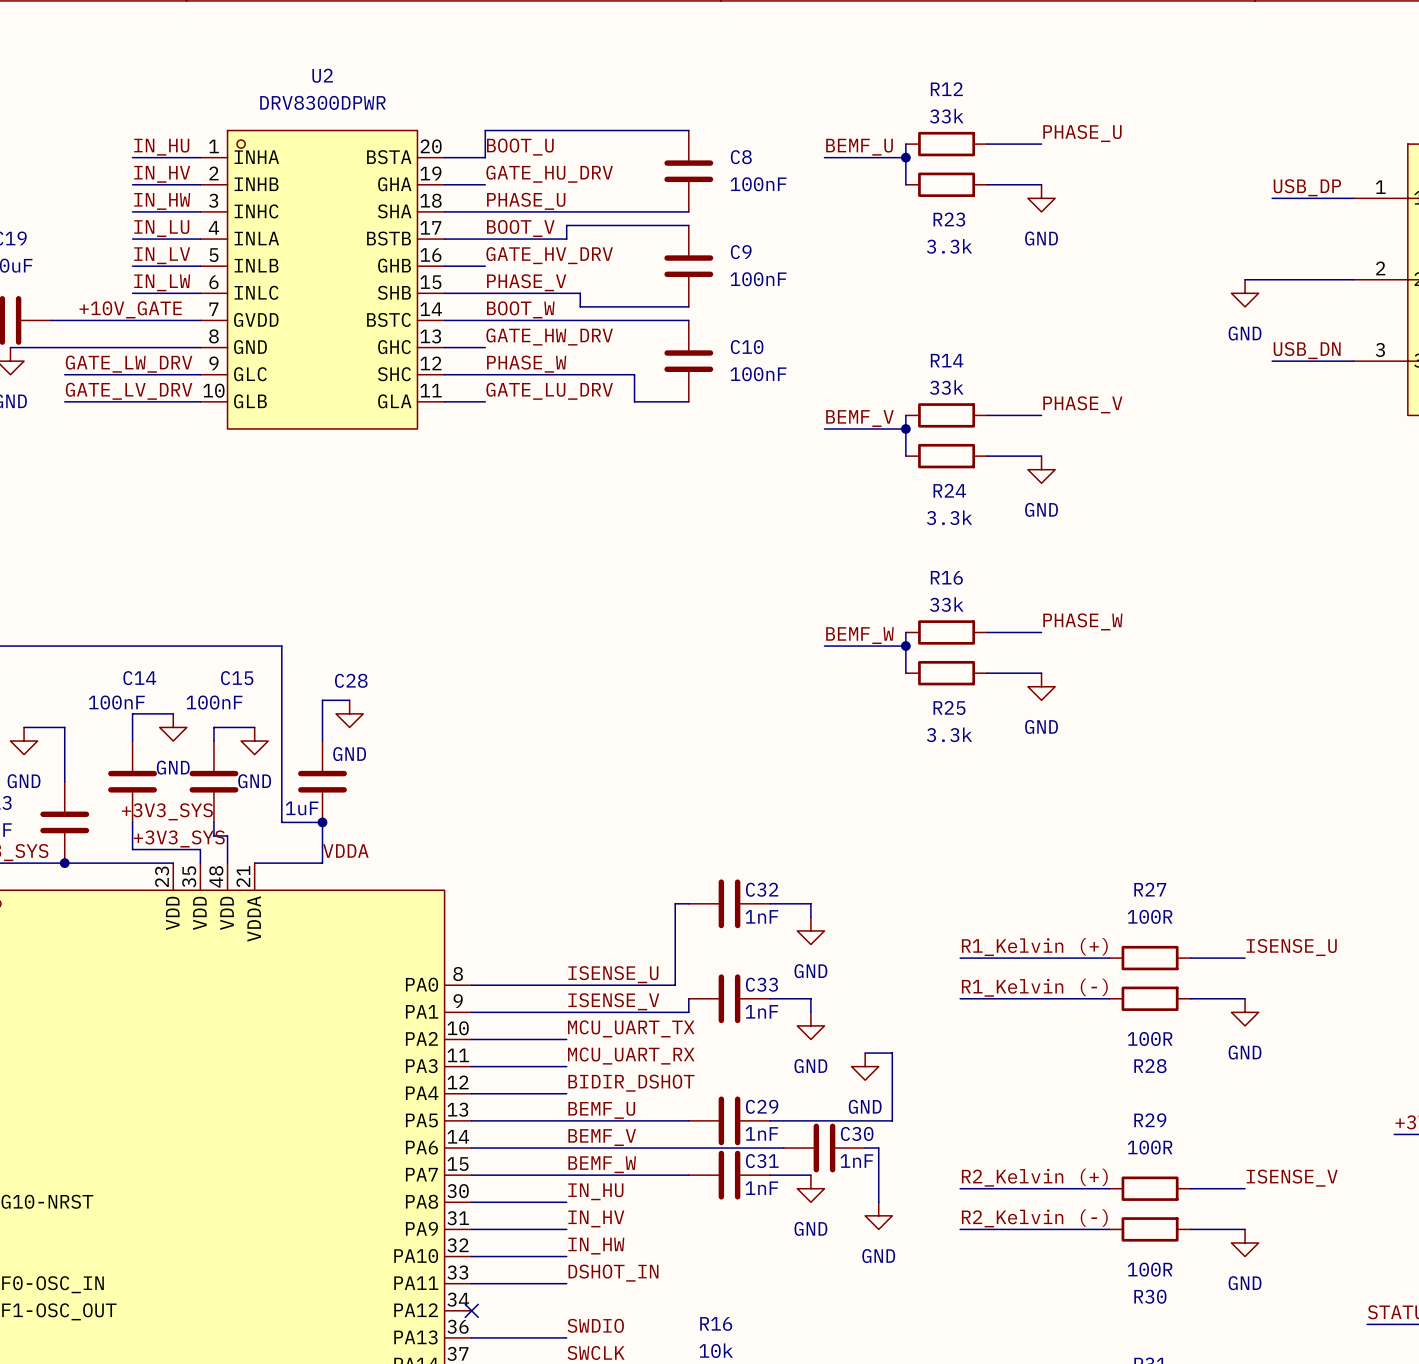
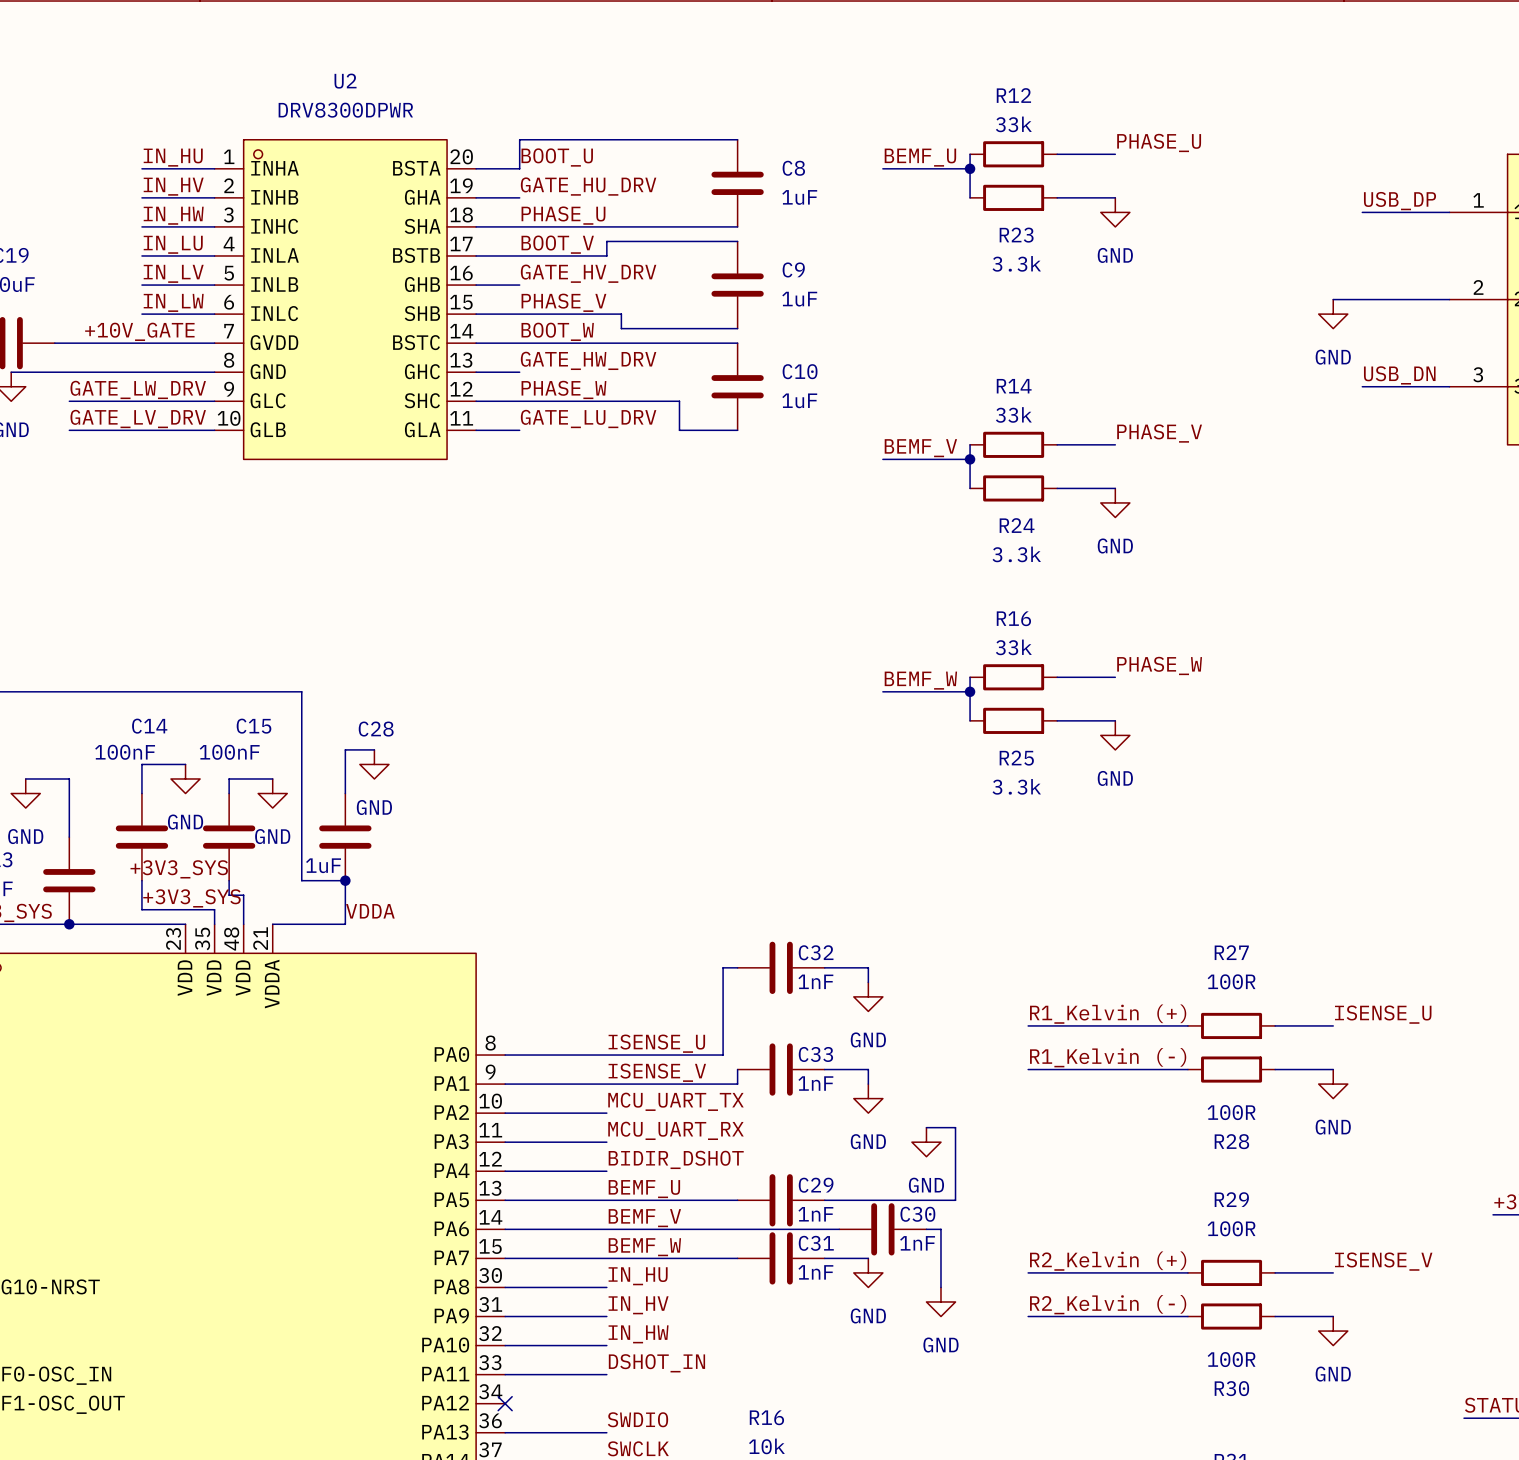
C8 value: 100nF (758, 184) -> 1uF (799, 197)
C9 value: 100nF (758, 279) -> 1uF (799, 299)
C10 value: 100nF (758, 374) -> 1uF (799, 400)

